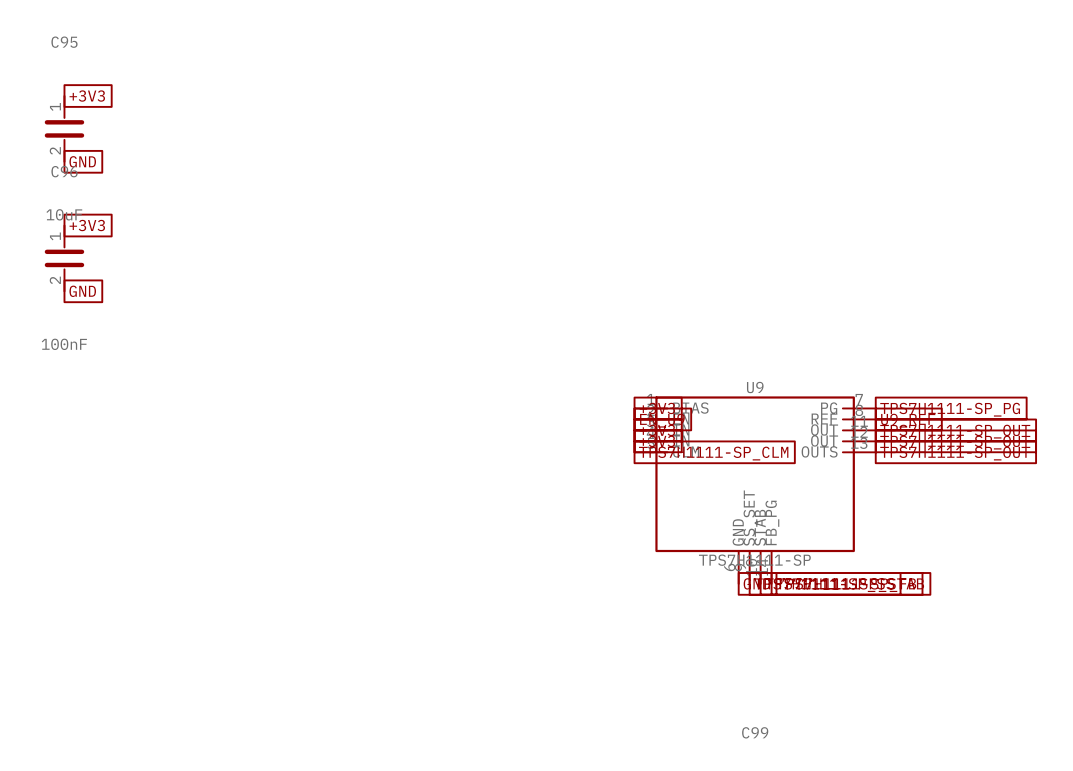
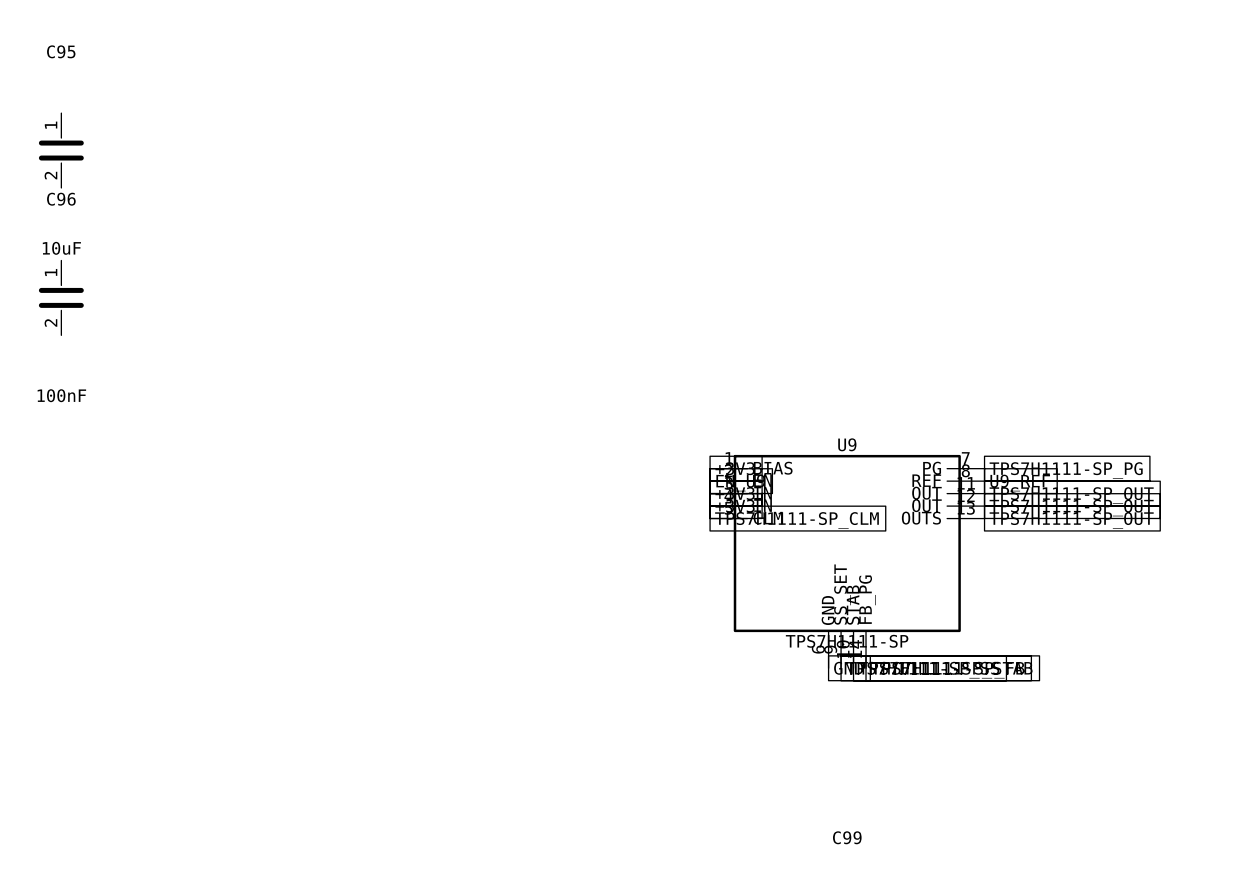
global label: +3V3 (87, 96) -> none
global label: GND (82, 161) -> none
global label: +3V3 (87, 225) -> none
global label: GND (82, 291) -> none

